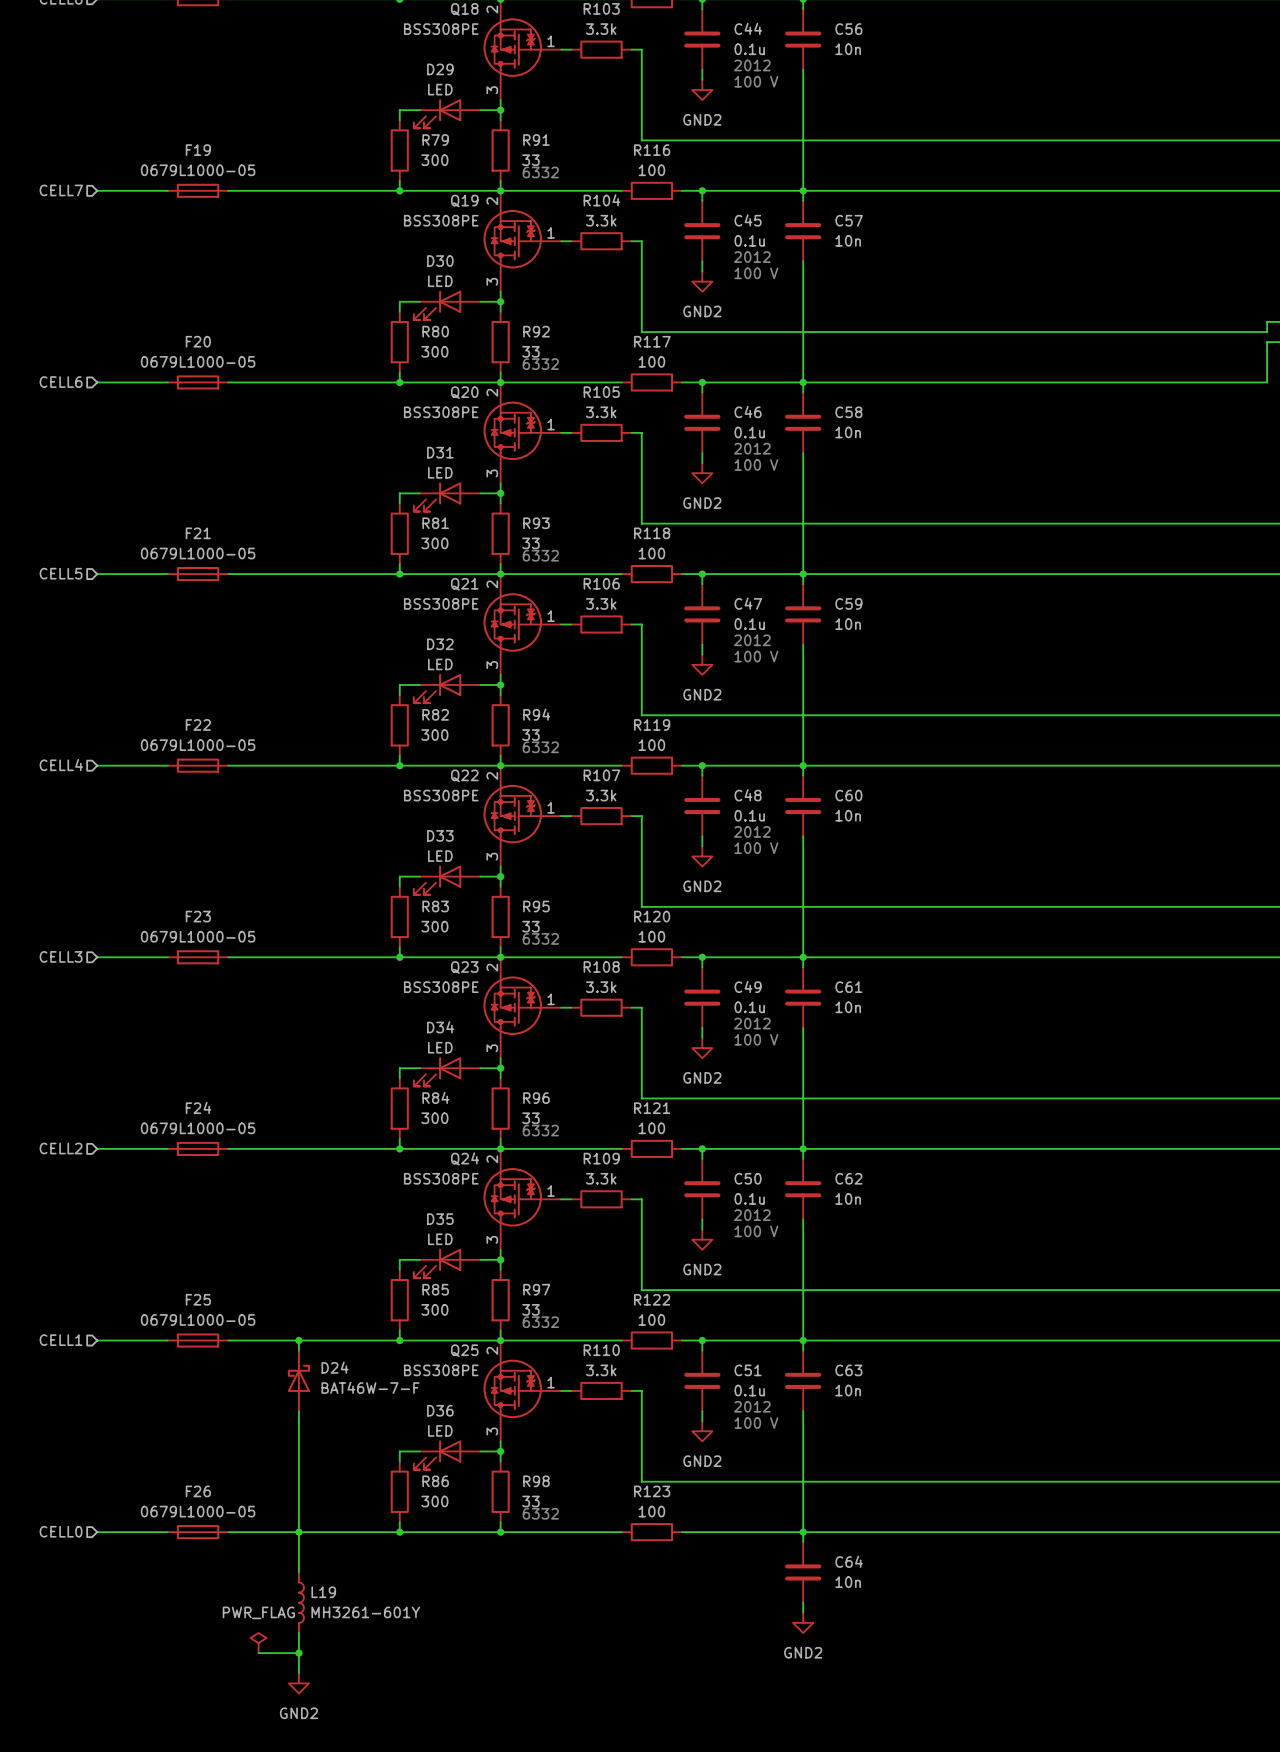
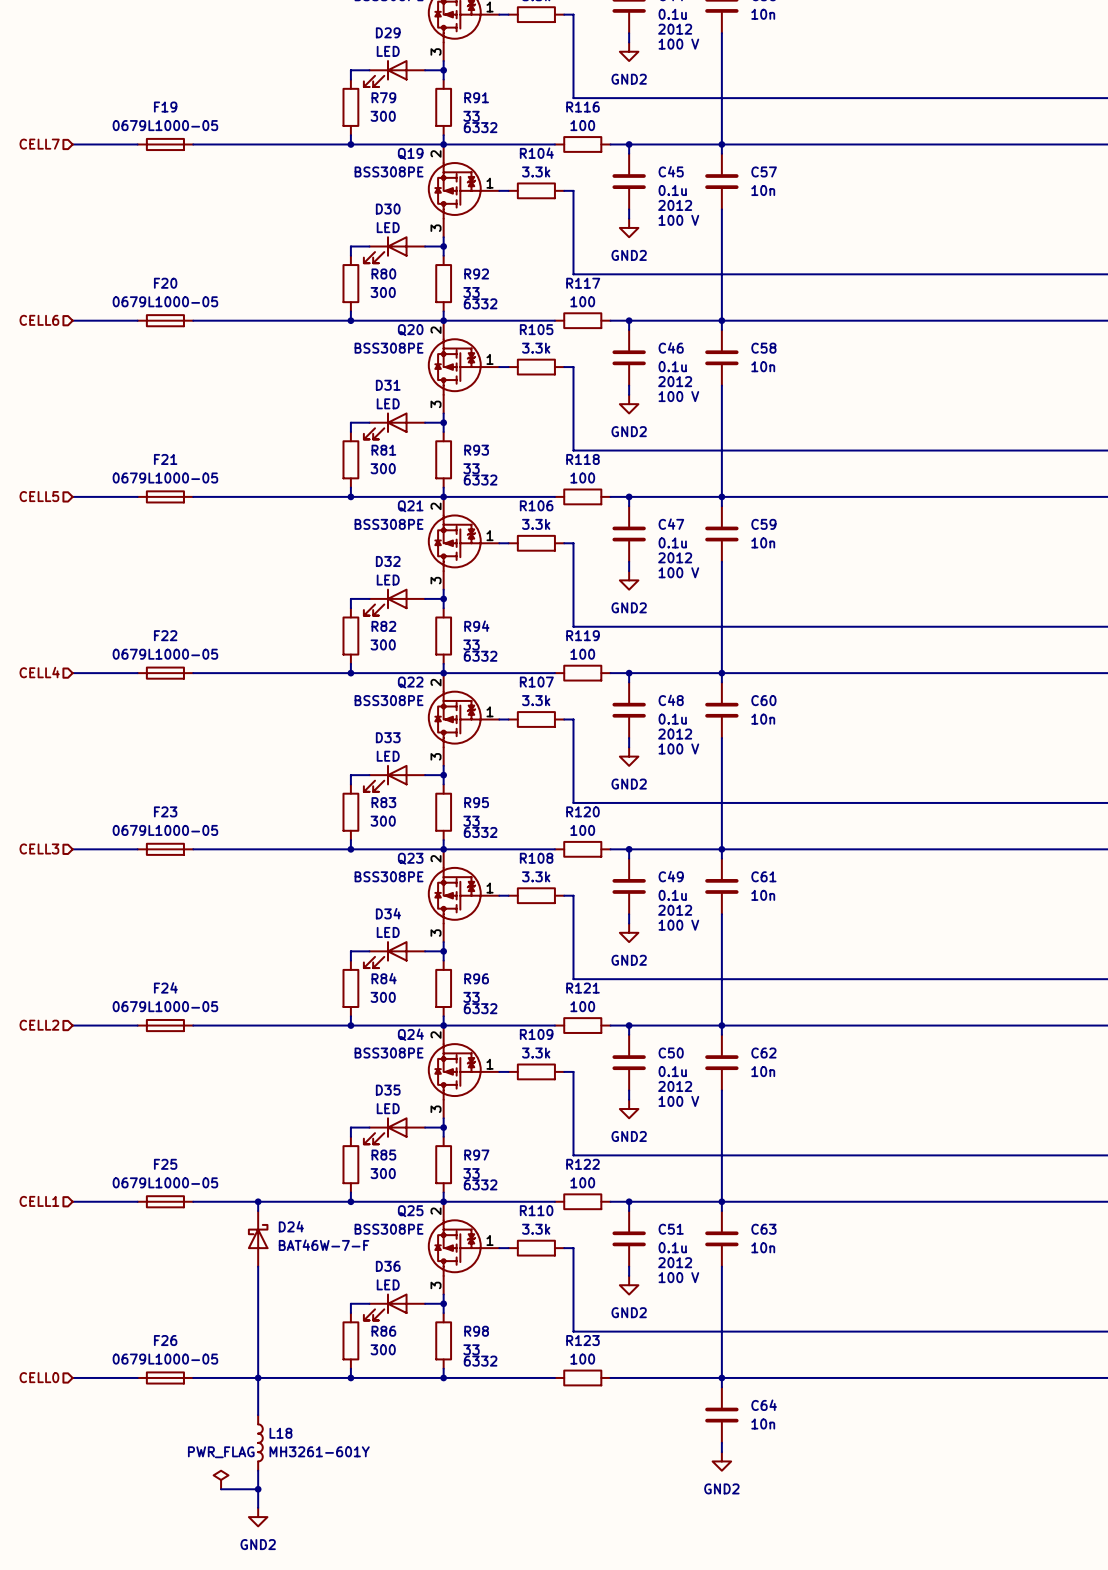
L19 name: L19 (323, 1592) -> L18 (280, 1433)

